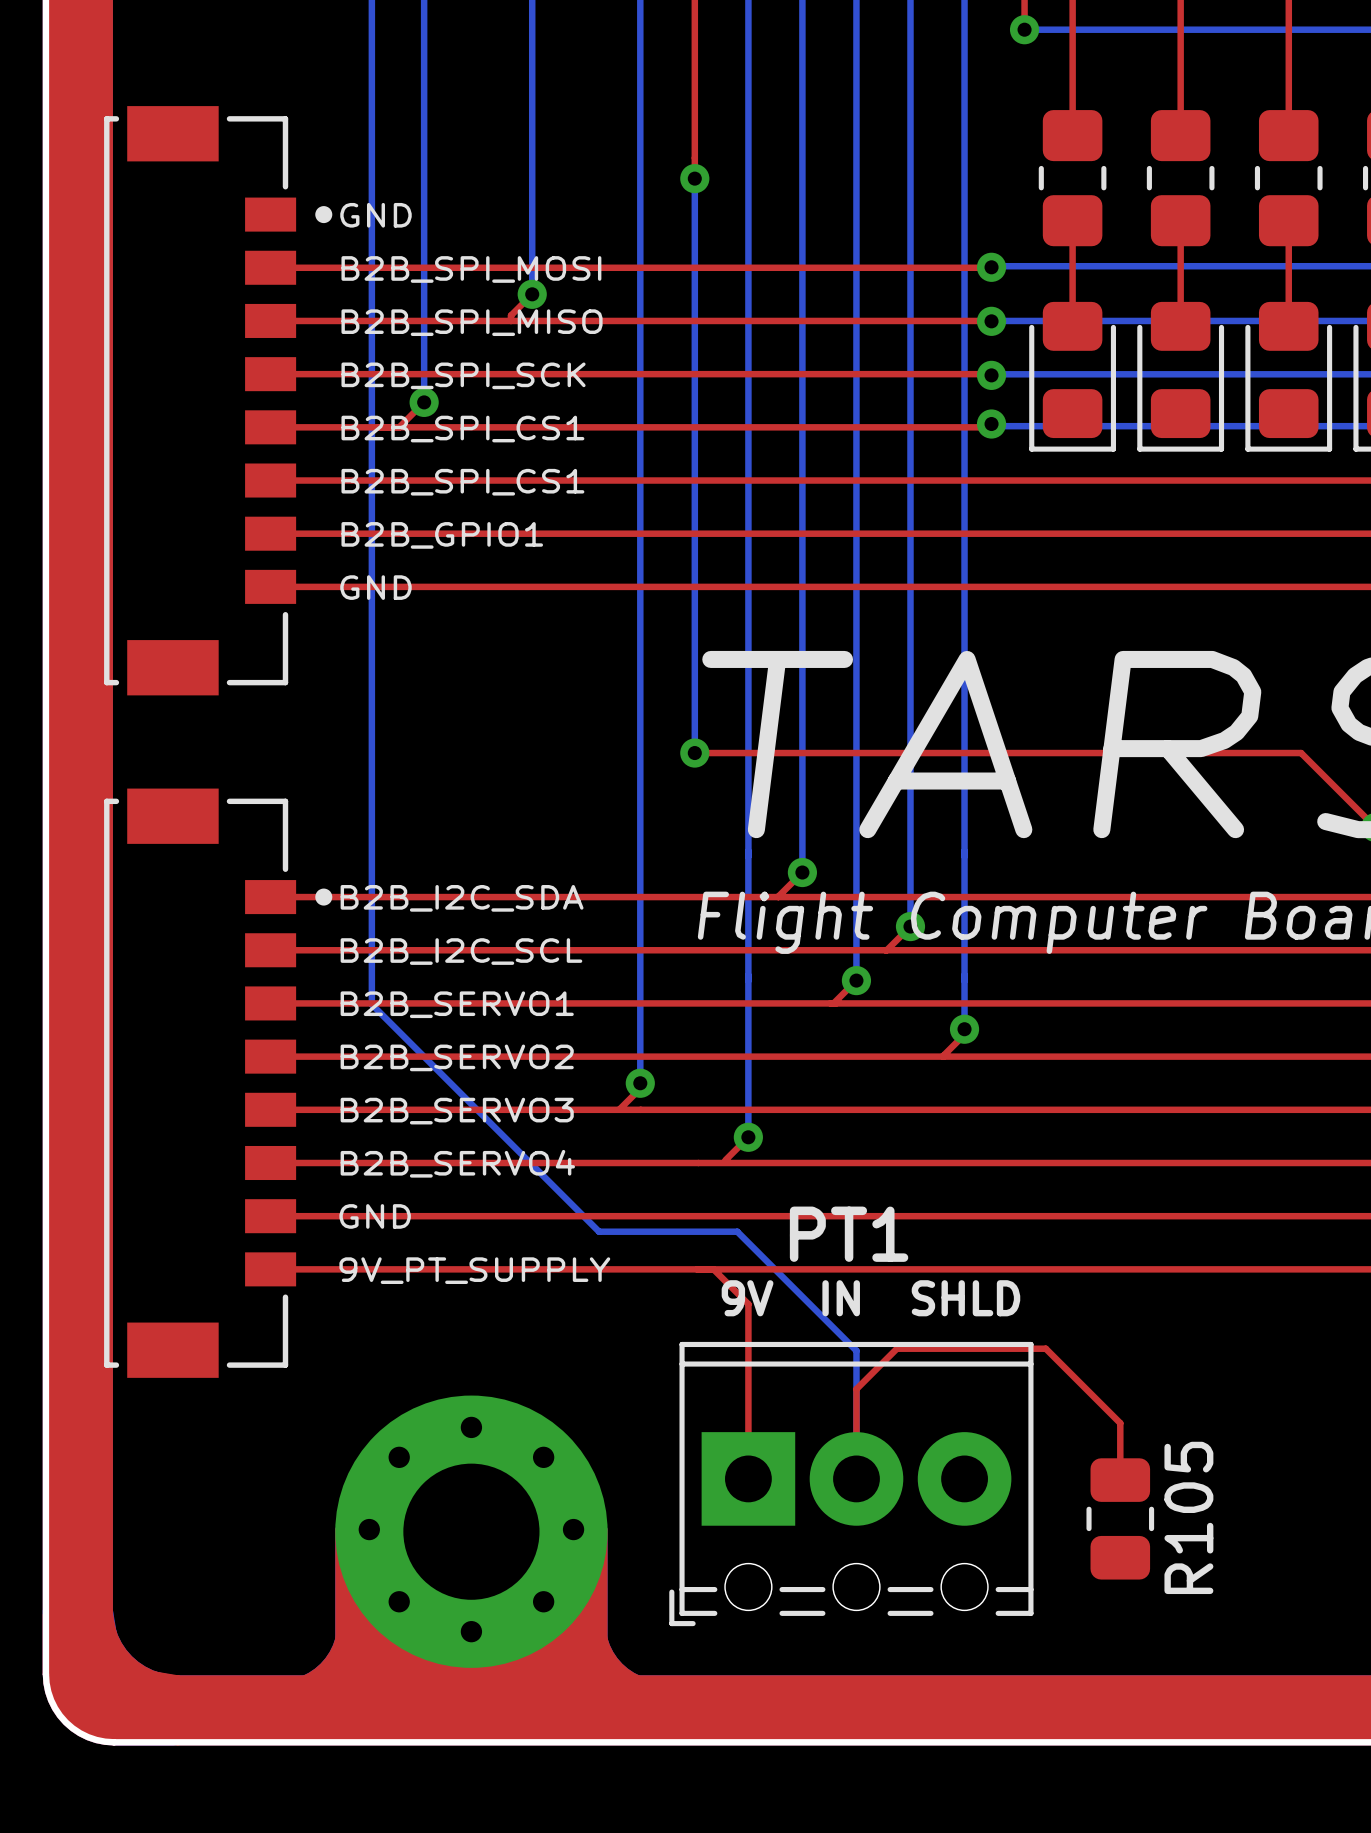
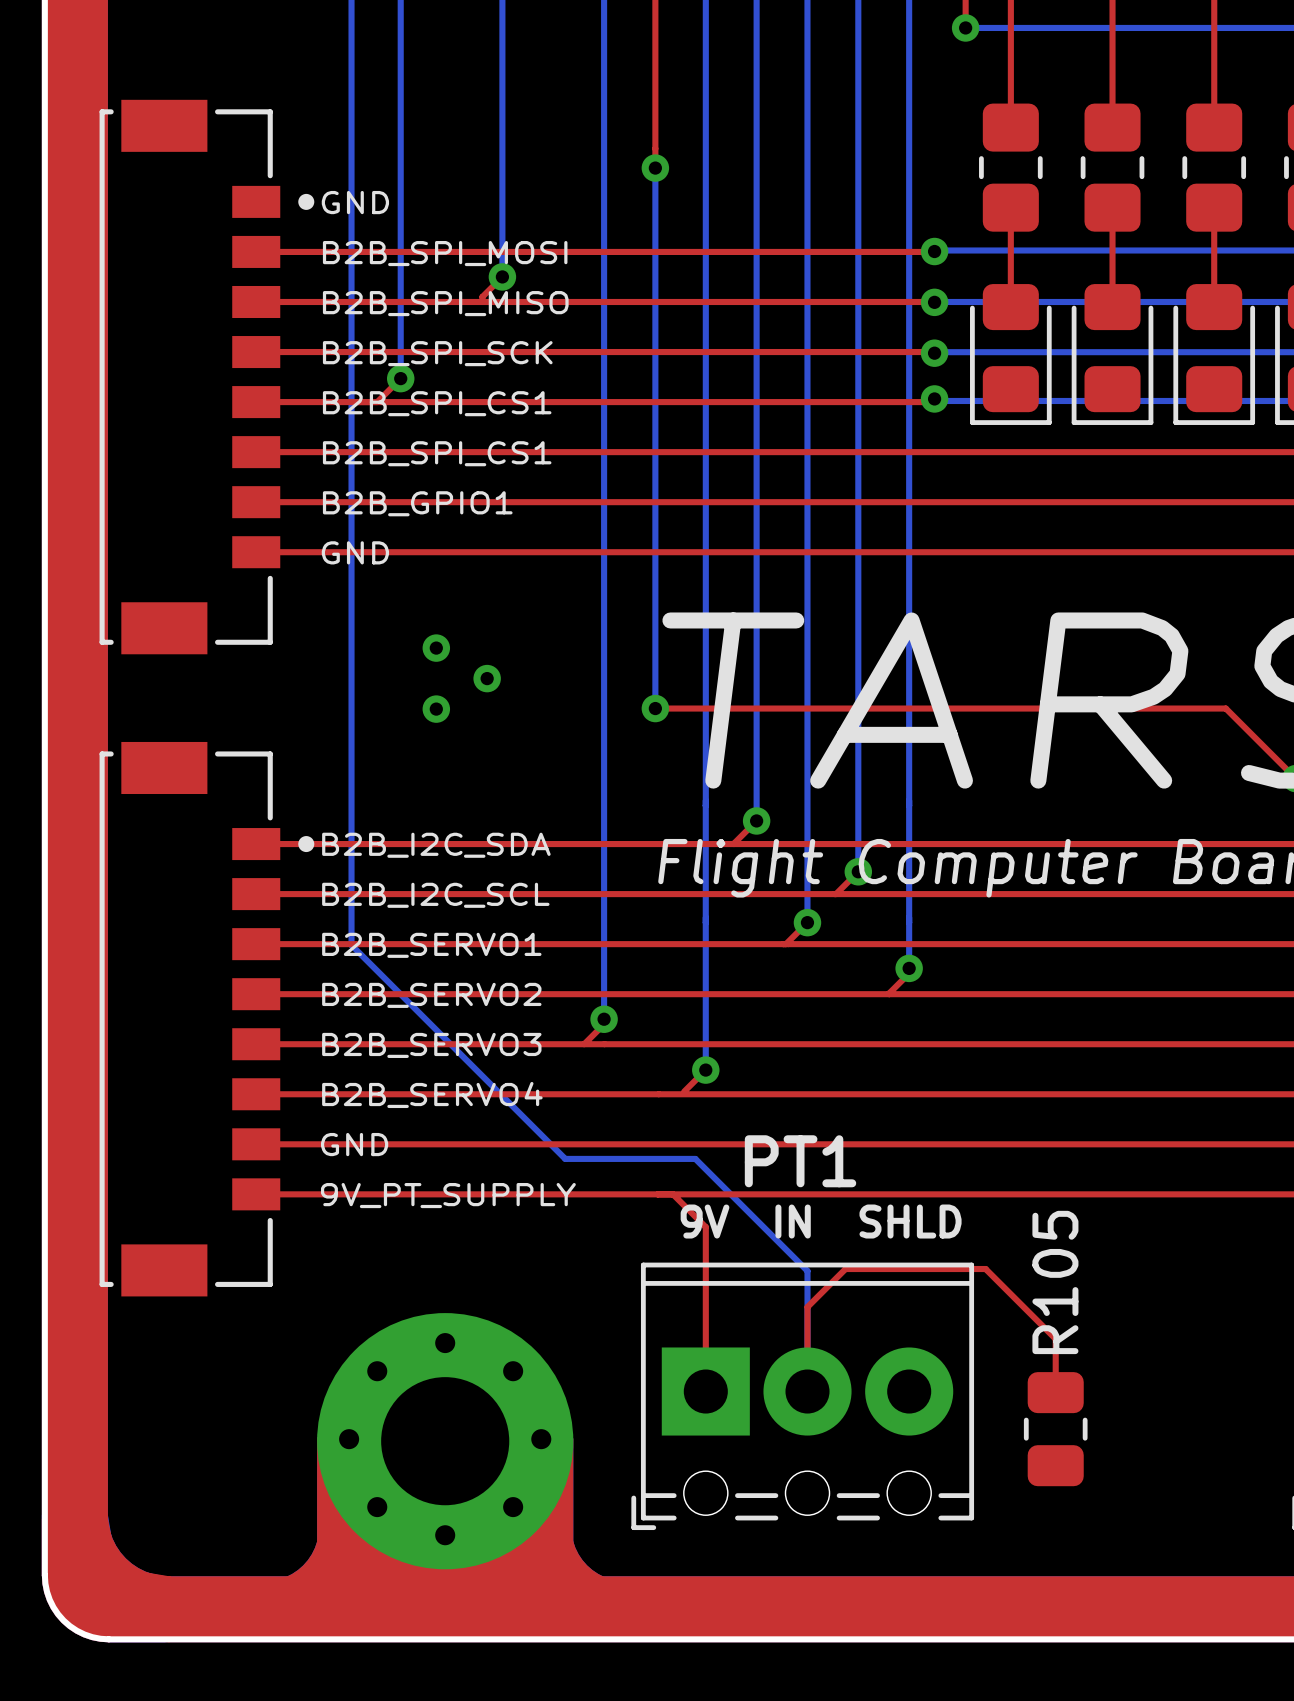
via: none -> (436, 648)
via: none -> (487, 678)
via: none -> (436, 709)
R105 name position: R105 (1188, 1517) -> R105 (1055, 1282)

